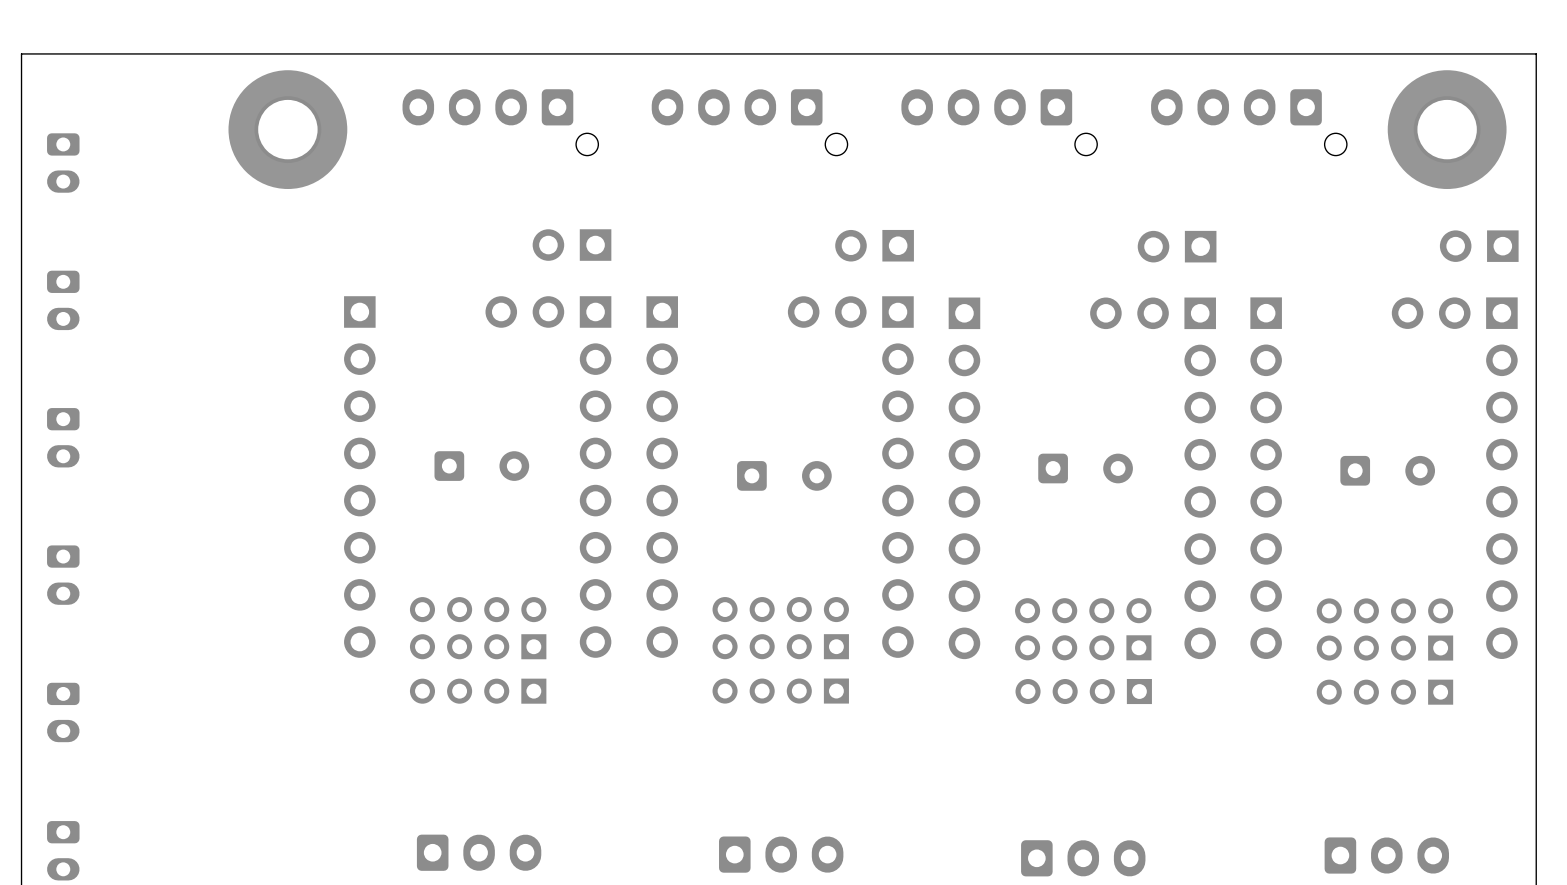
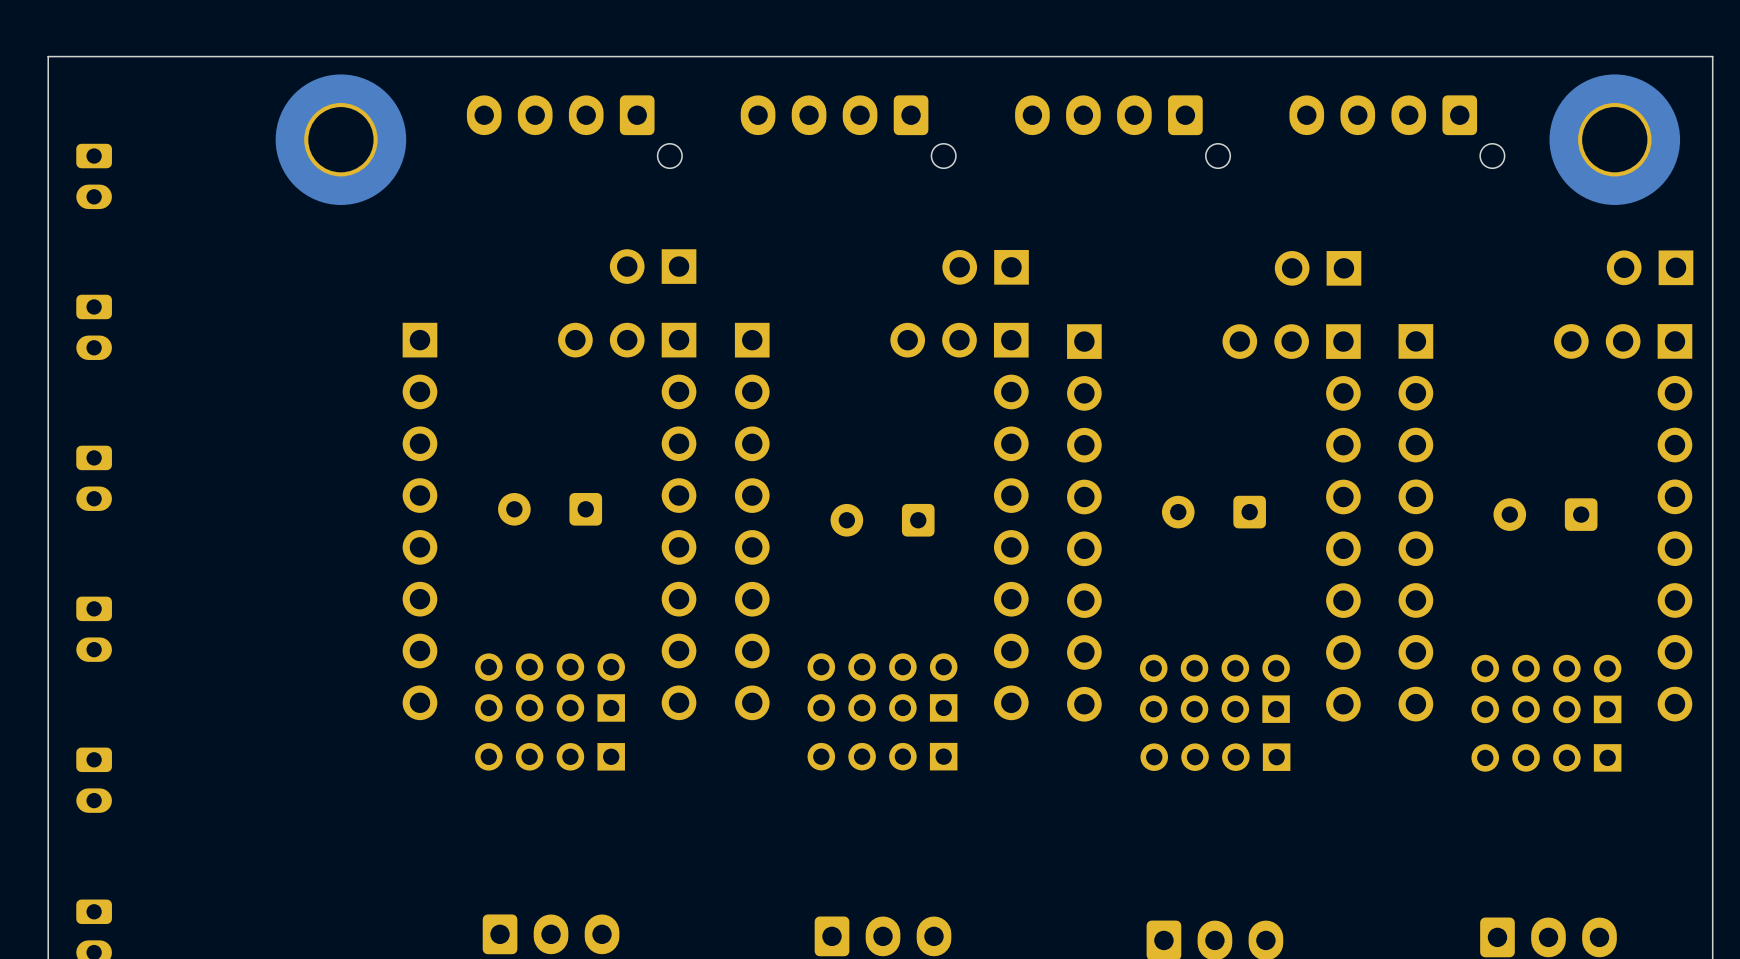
part rotation: 0° (481, 466) -> 180° (550, 509)
part rotation: 0° (1085, 468) -> 180° (1213, 512)
part rotation: 0° (1387, 470) -> 180° (1545, 514)
part rotation: 0° (784, 475) -> 180° (882, 520)

